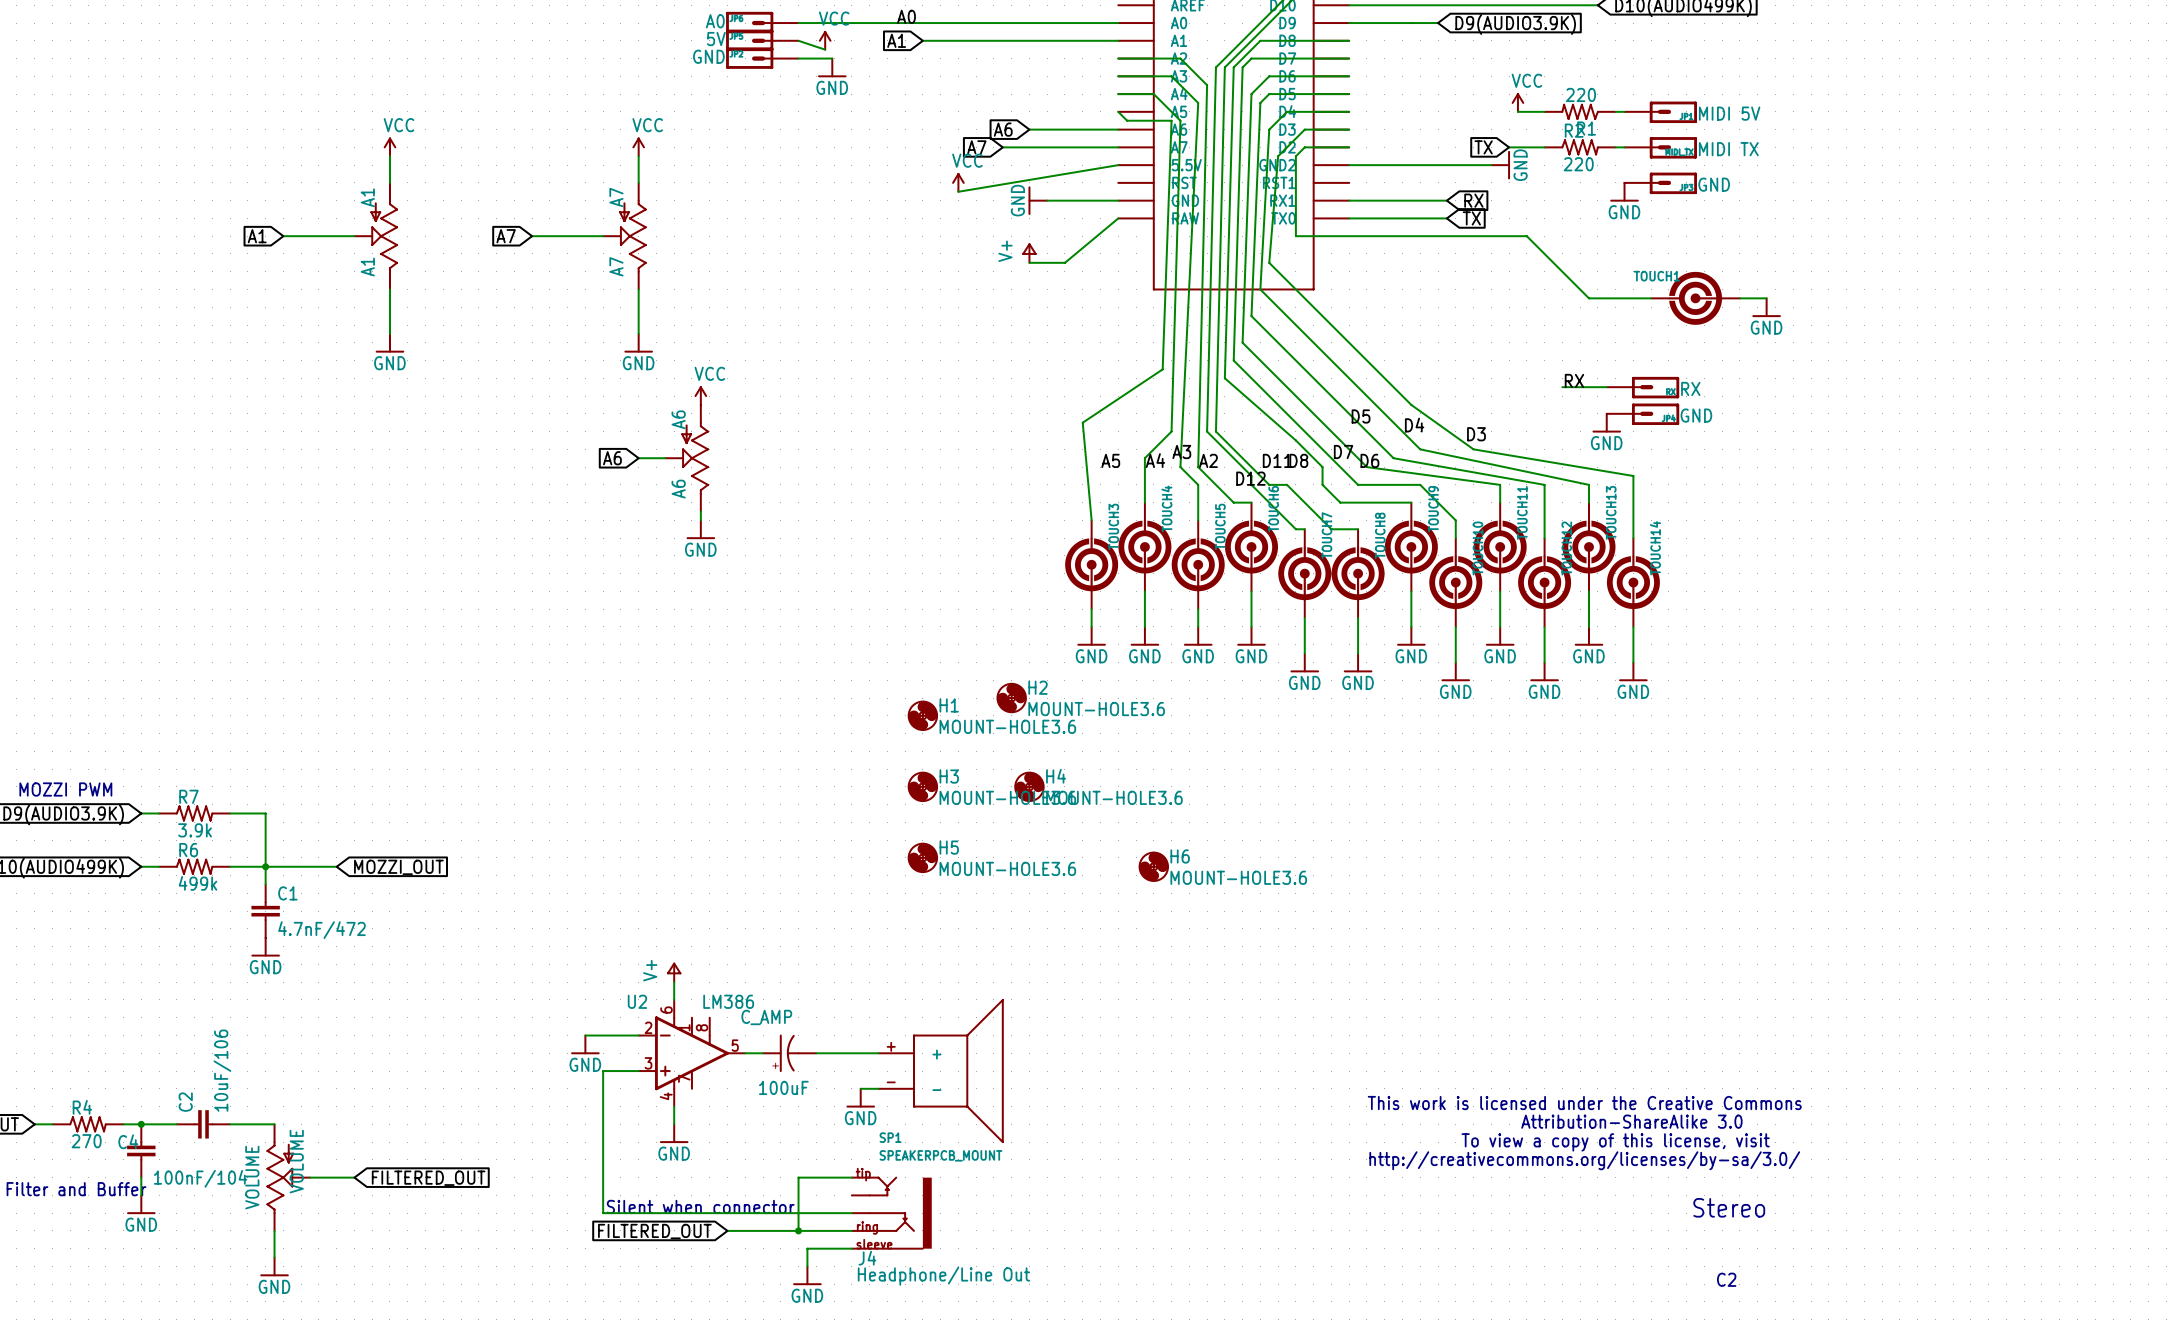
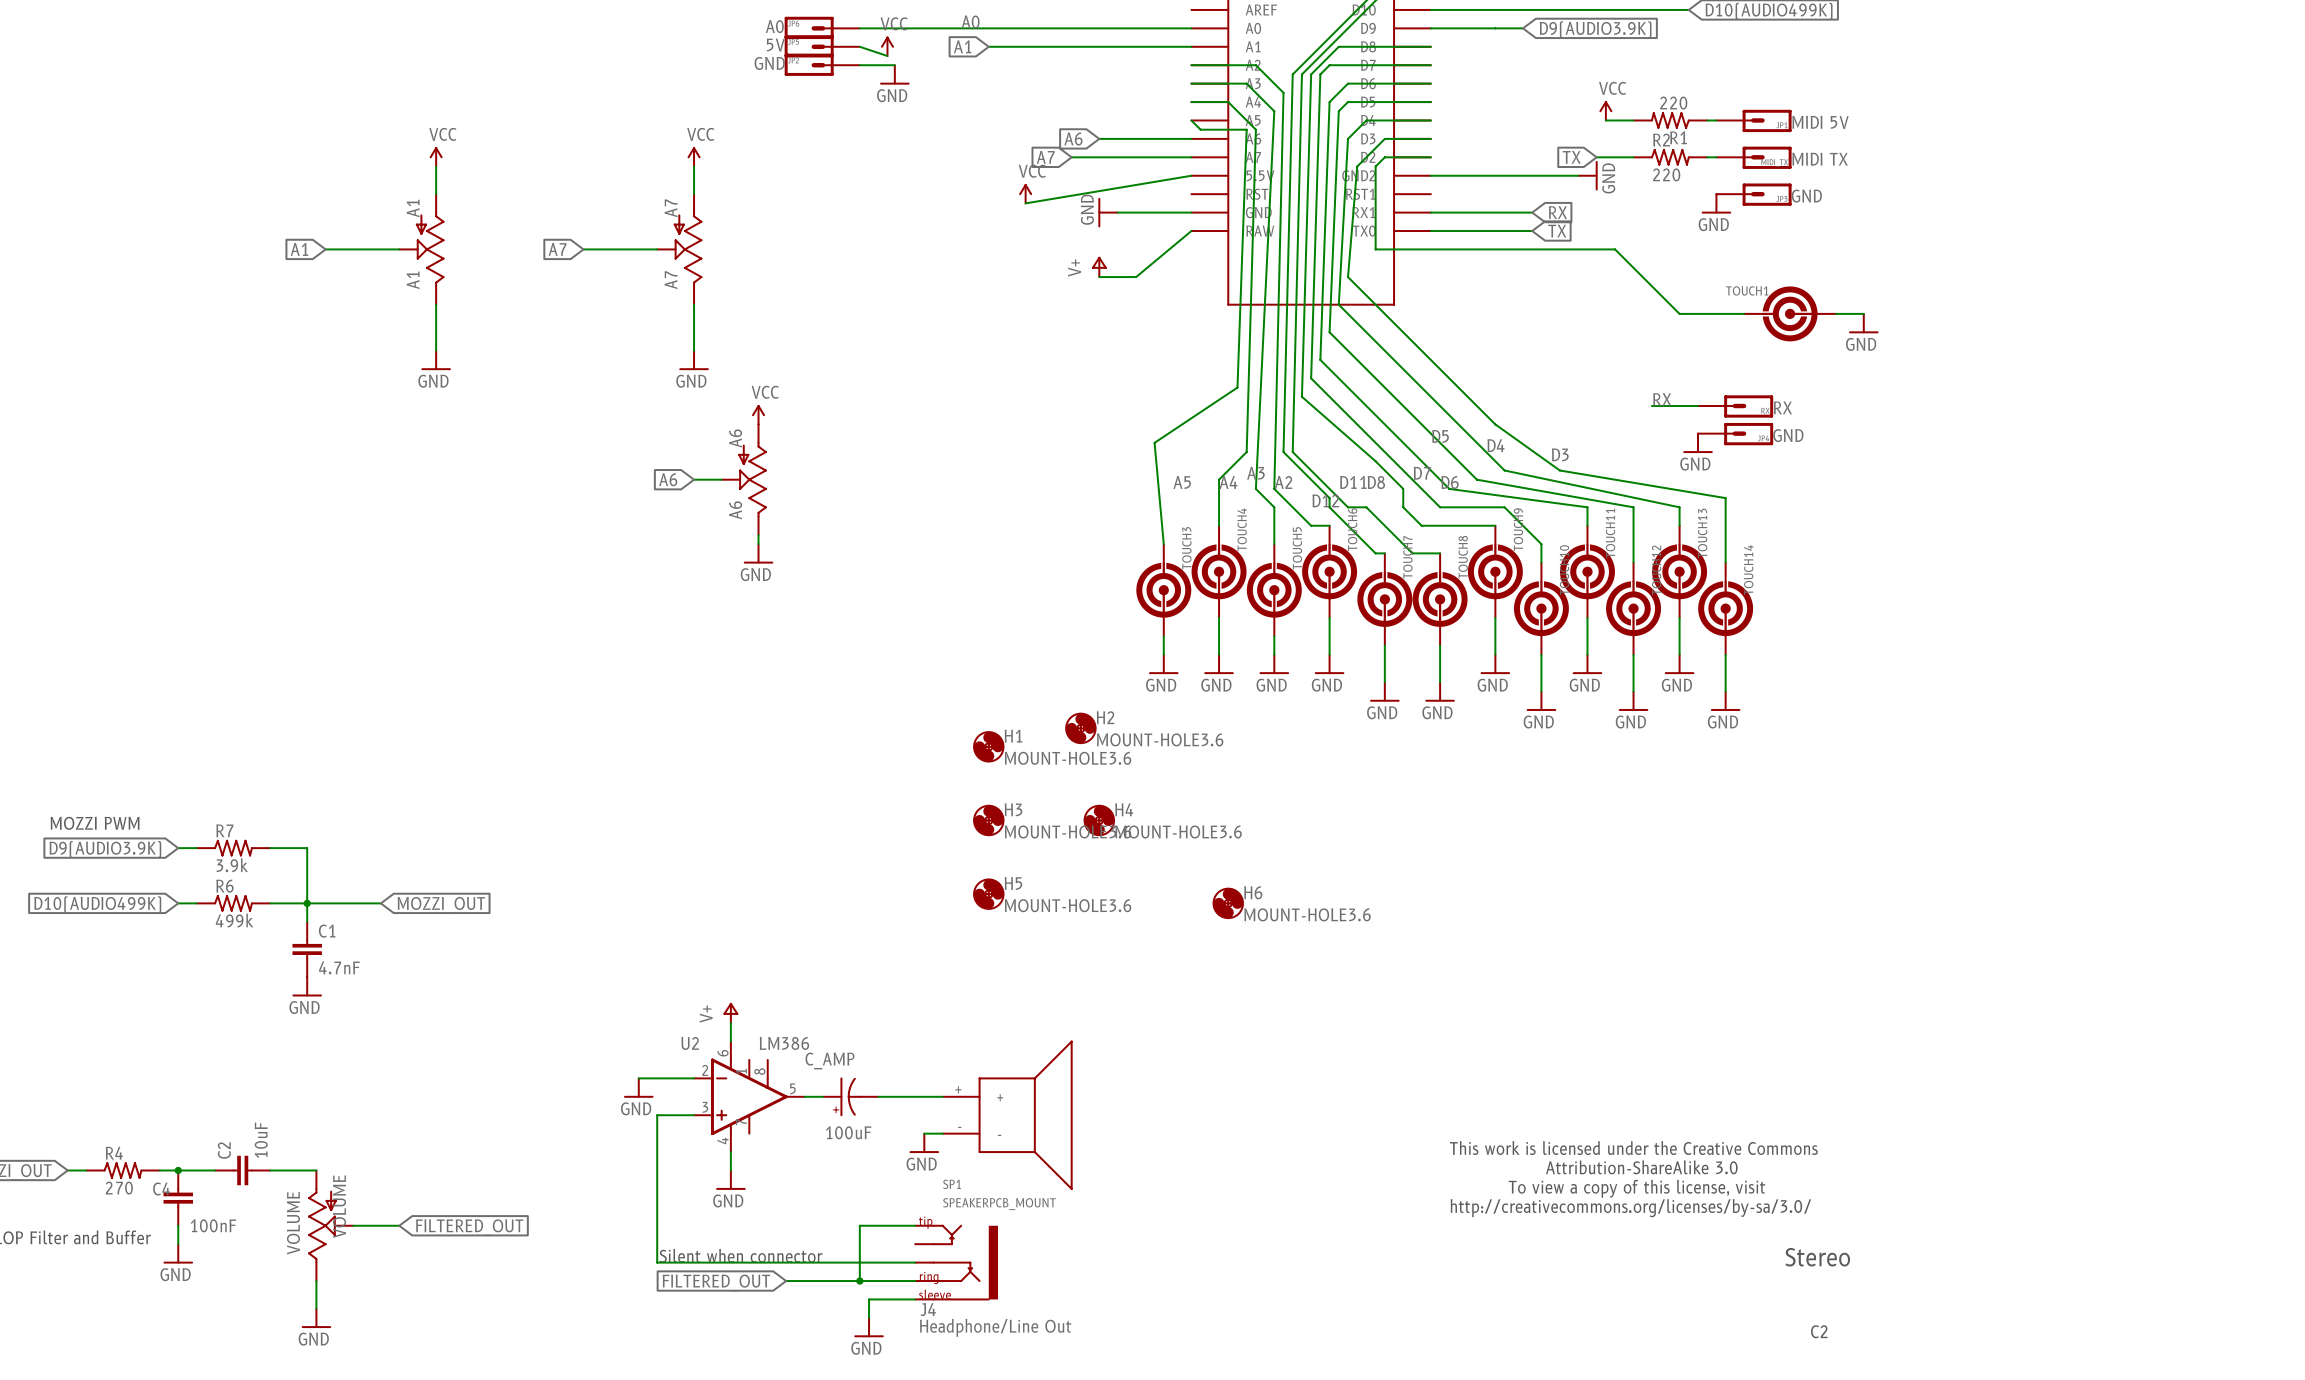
C1 value: 4.7nF/472 (321, 930) -> 4.7nF (339, 967)
C2 value: 10uF/106 (222, 1070) -> 10uF (261, 1140)
C4 value: 100nF/104 (200, 1178) -> 100nF (213, 1225)

